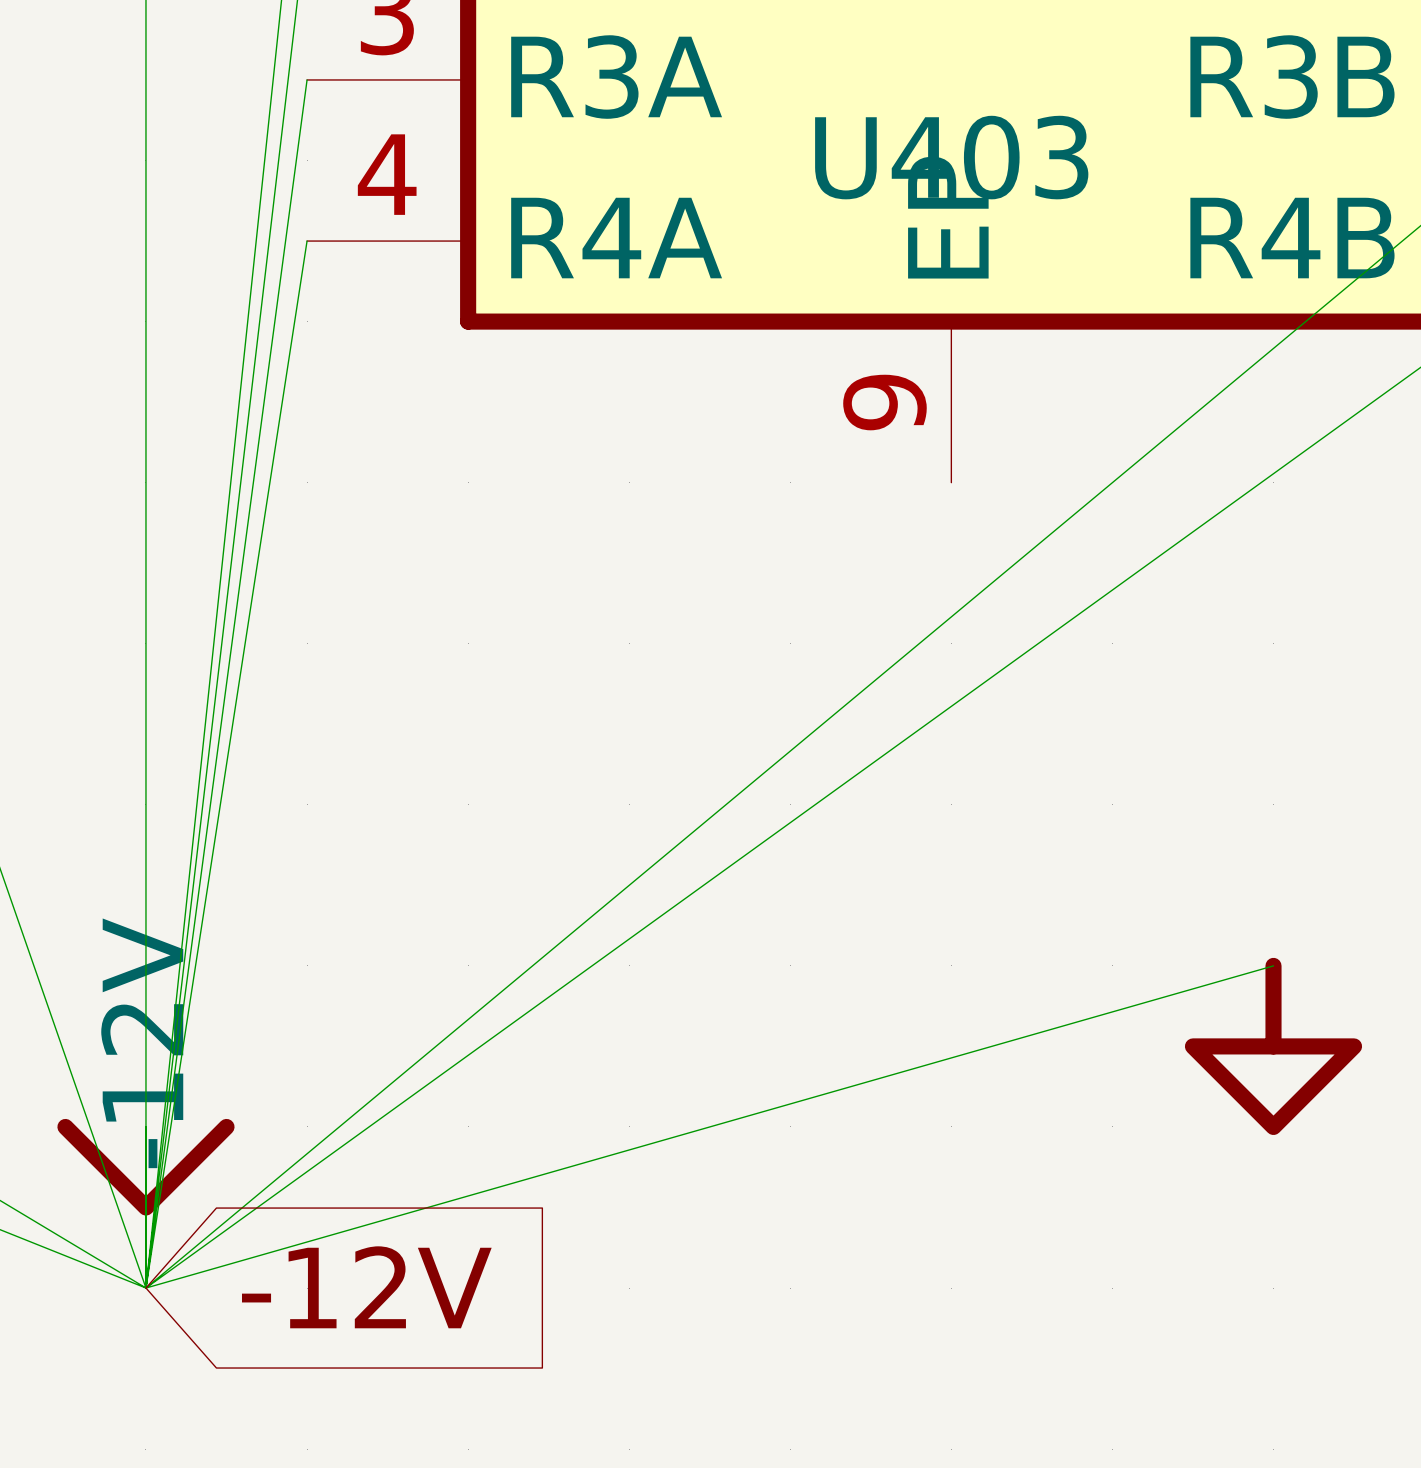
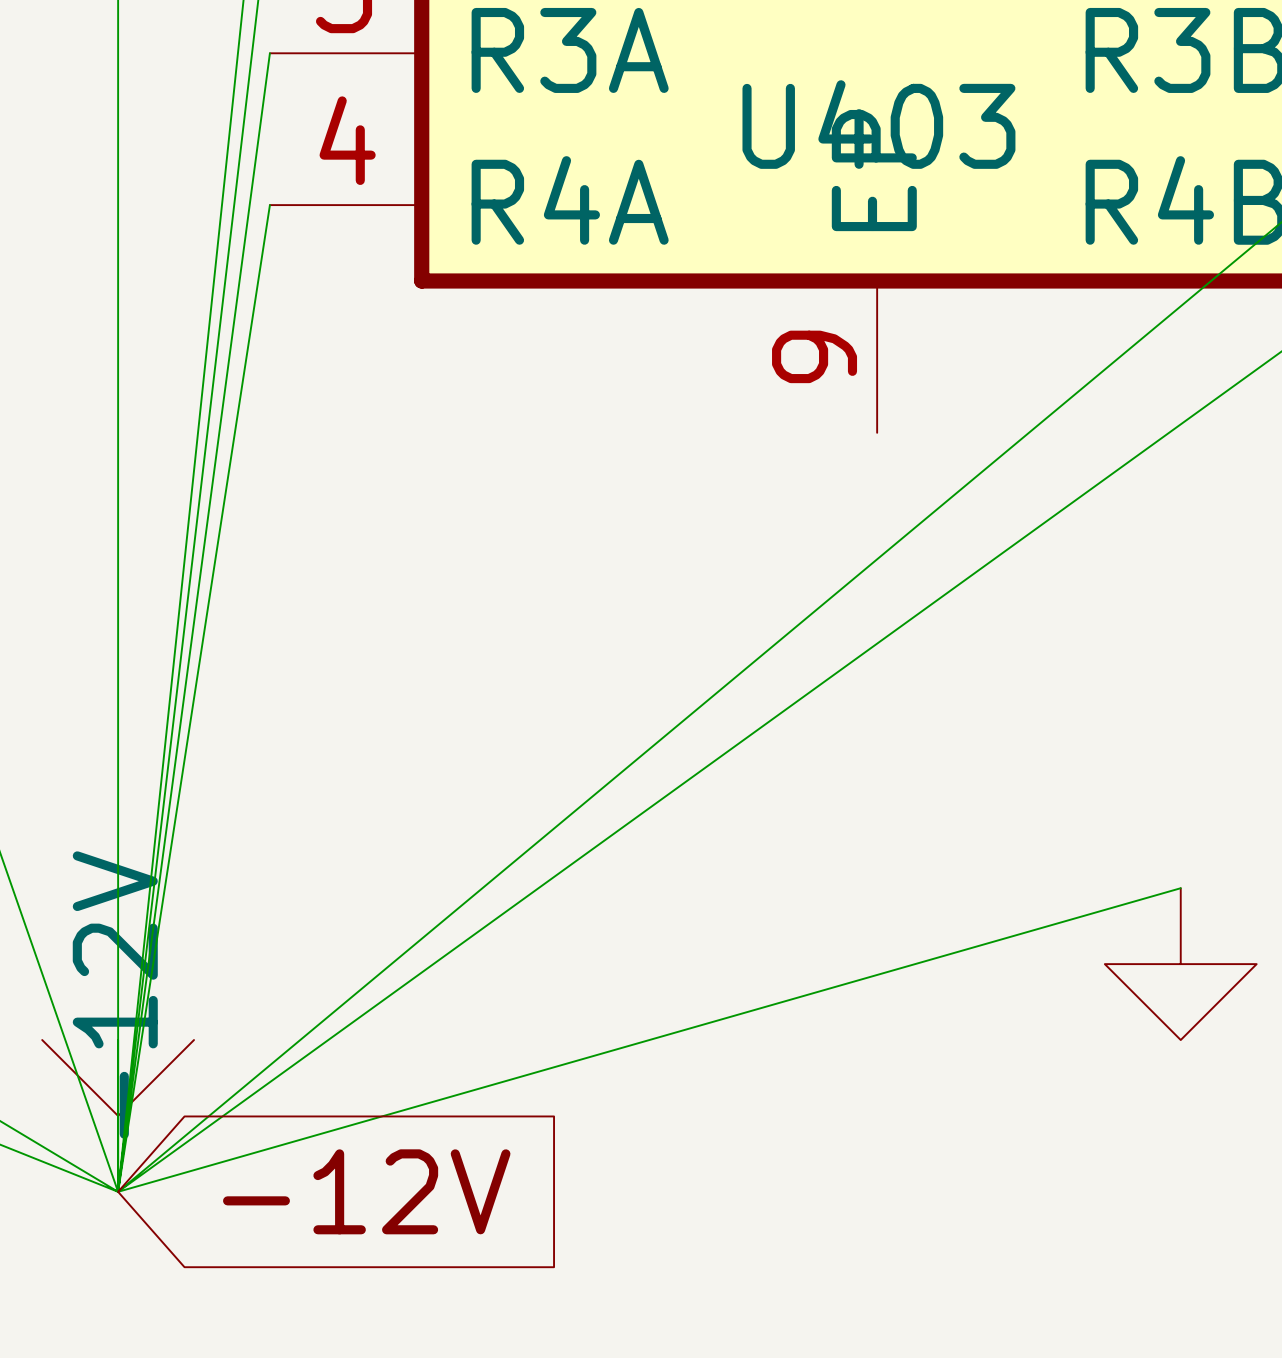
power symbol shape: [1184, 957, 1363, 1136] -> [1104, 888, 1257, 1041]
power symbol shape: [57, 1118, 235, 1216] -> [42, 1040, 195, 1116]

